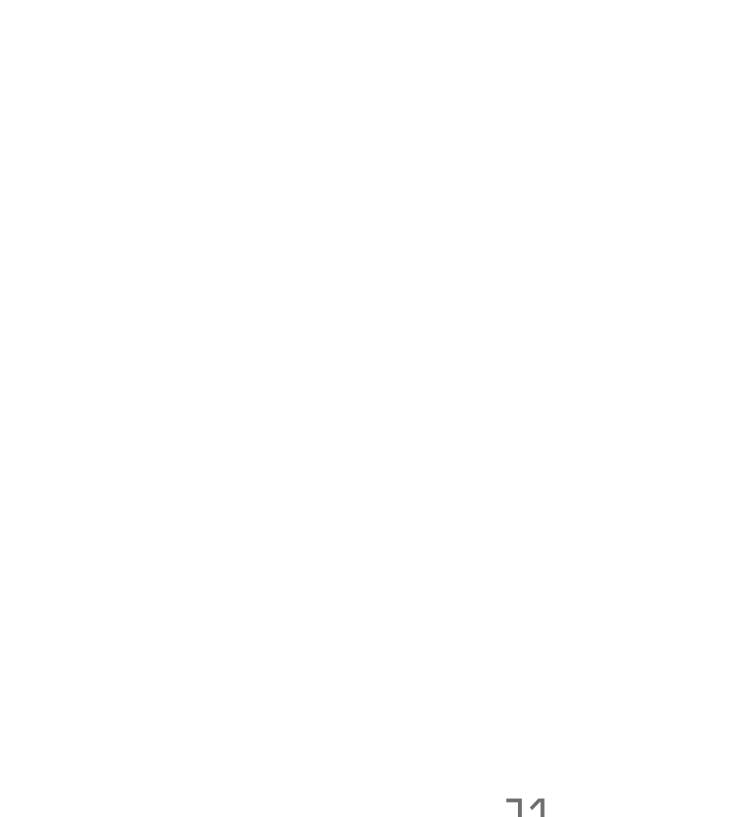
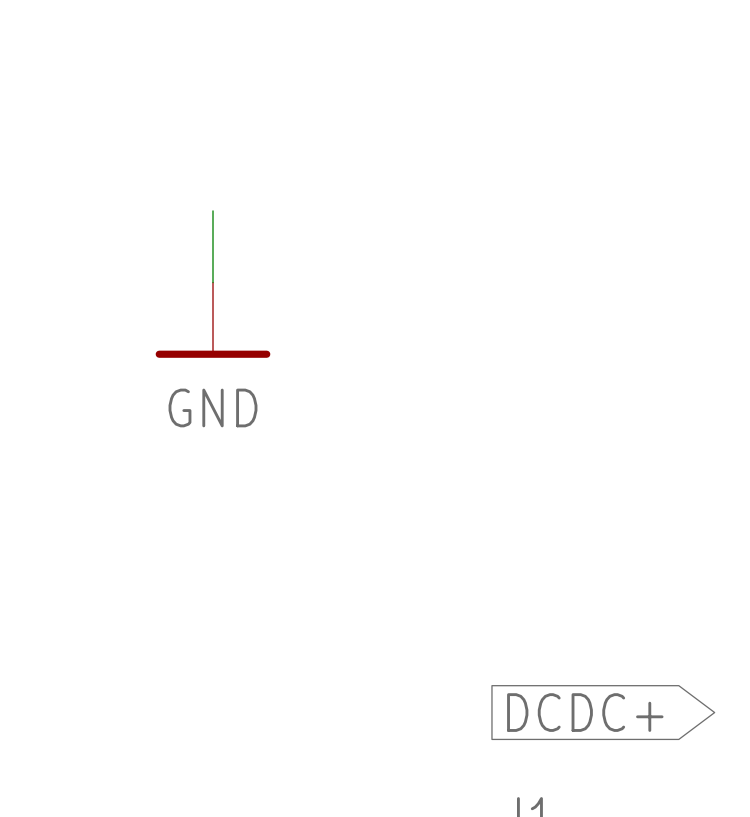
wire: none -> (213, 210) (213, 282)
power symbol: none -> GND (213, 320)
global label: none -> DCDC+ (585, 712)

